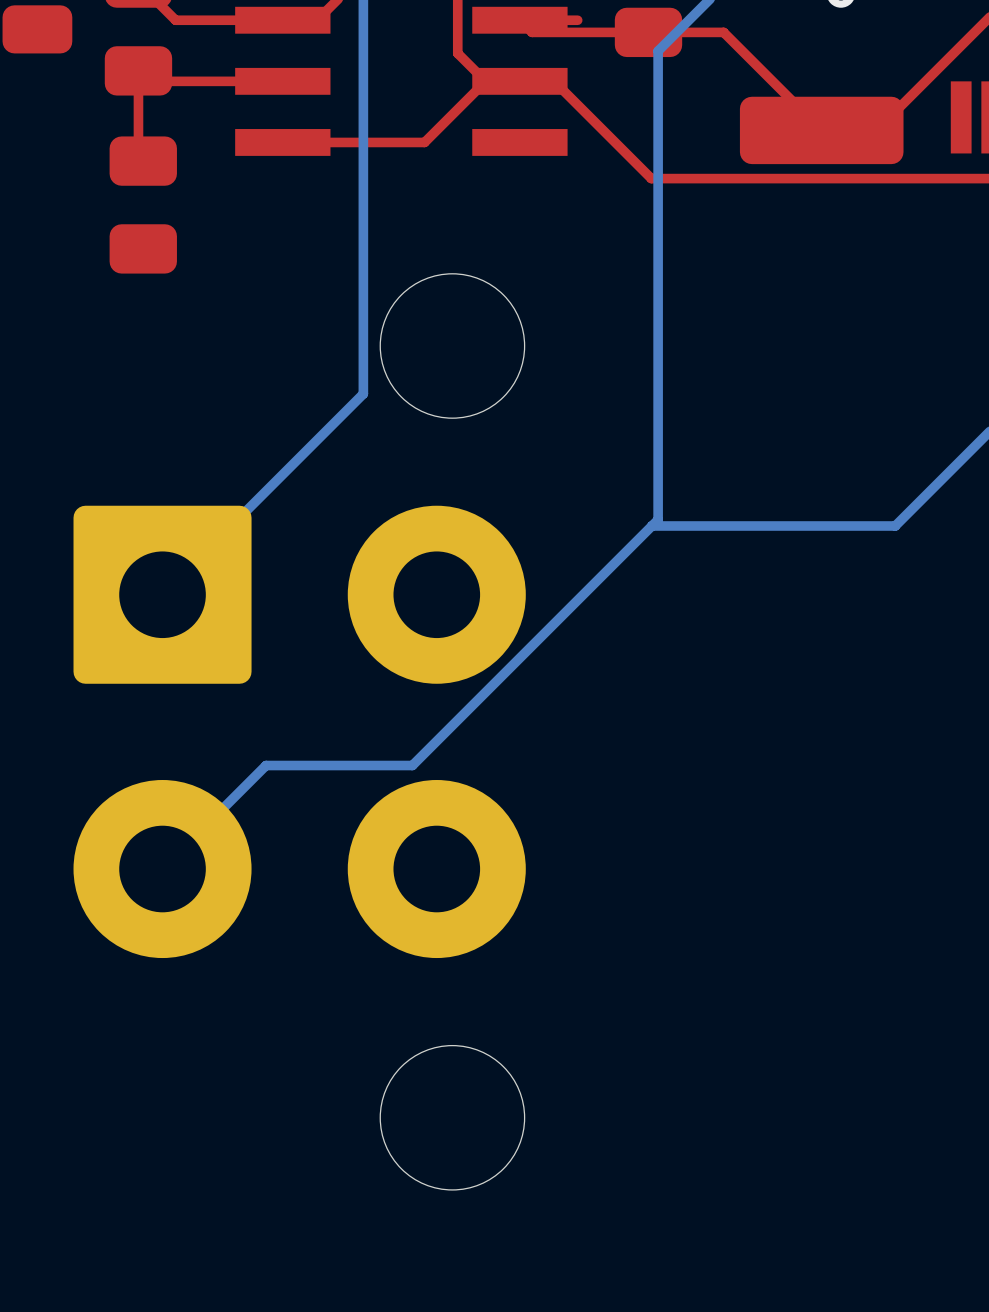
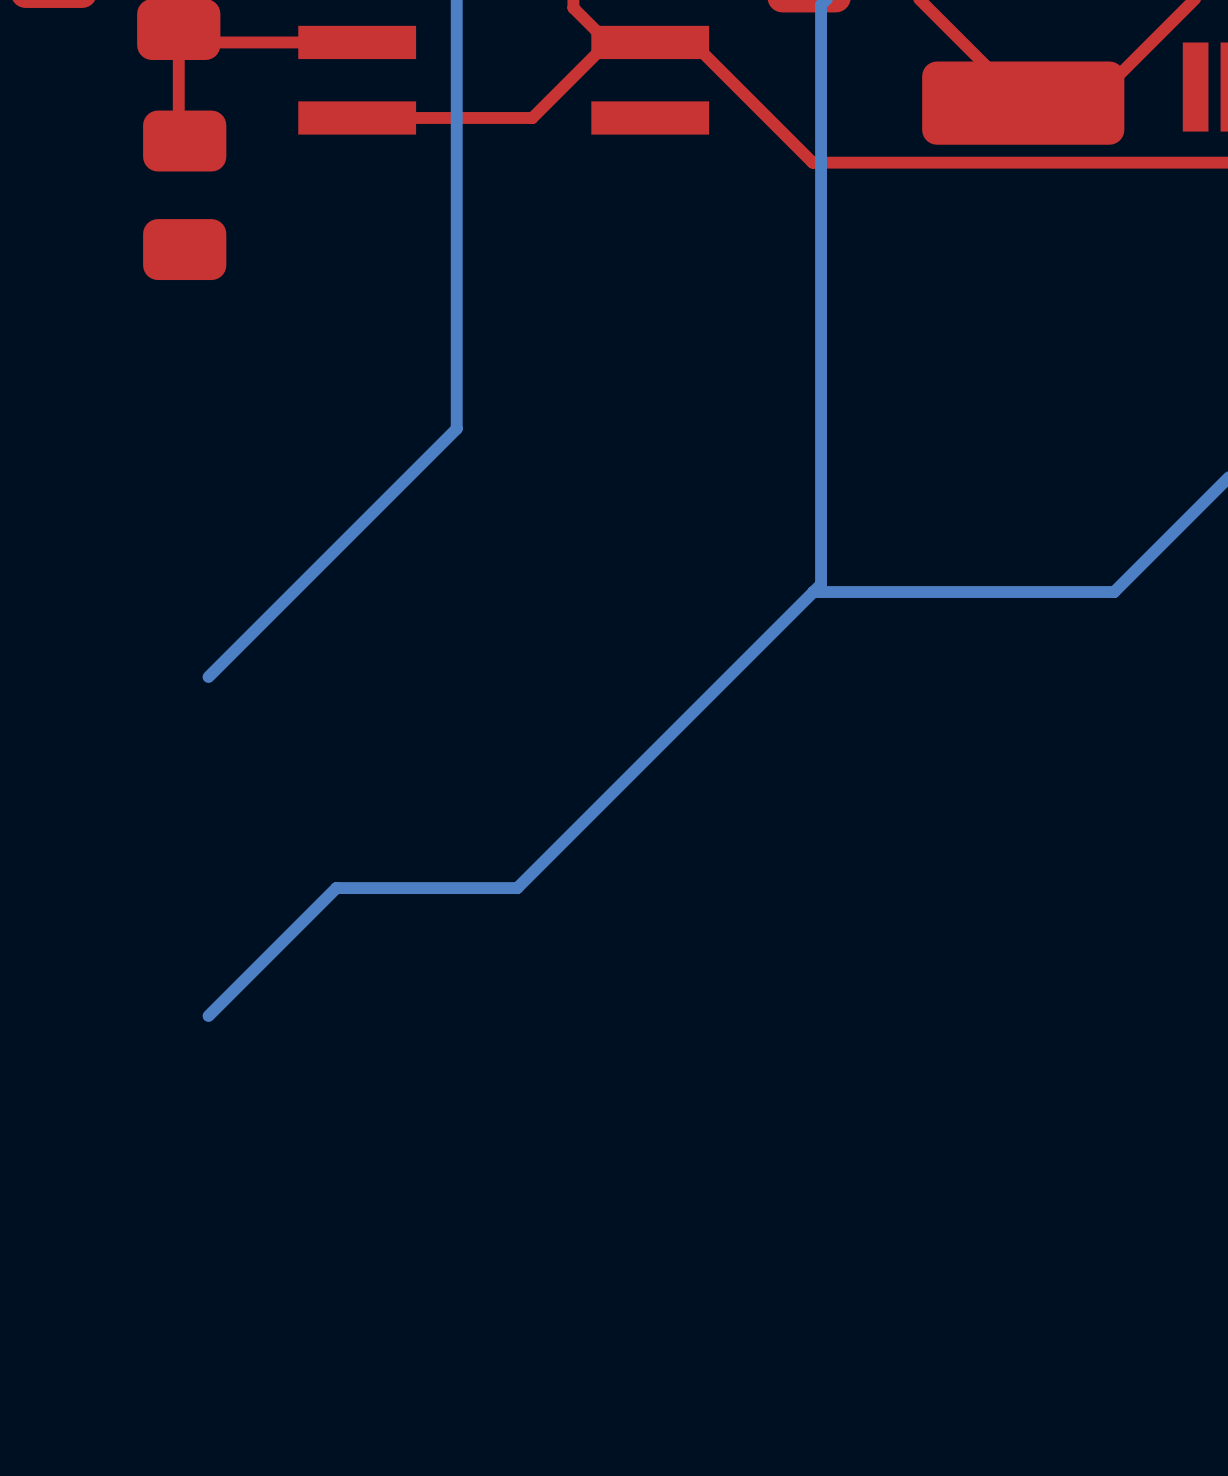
part: (299, 731) -> none

